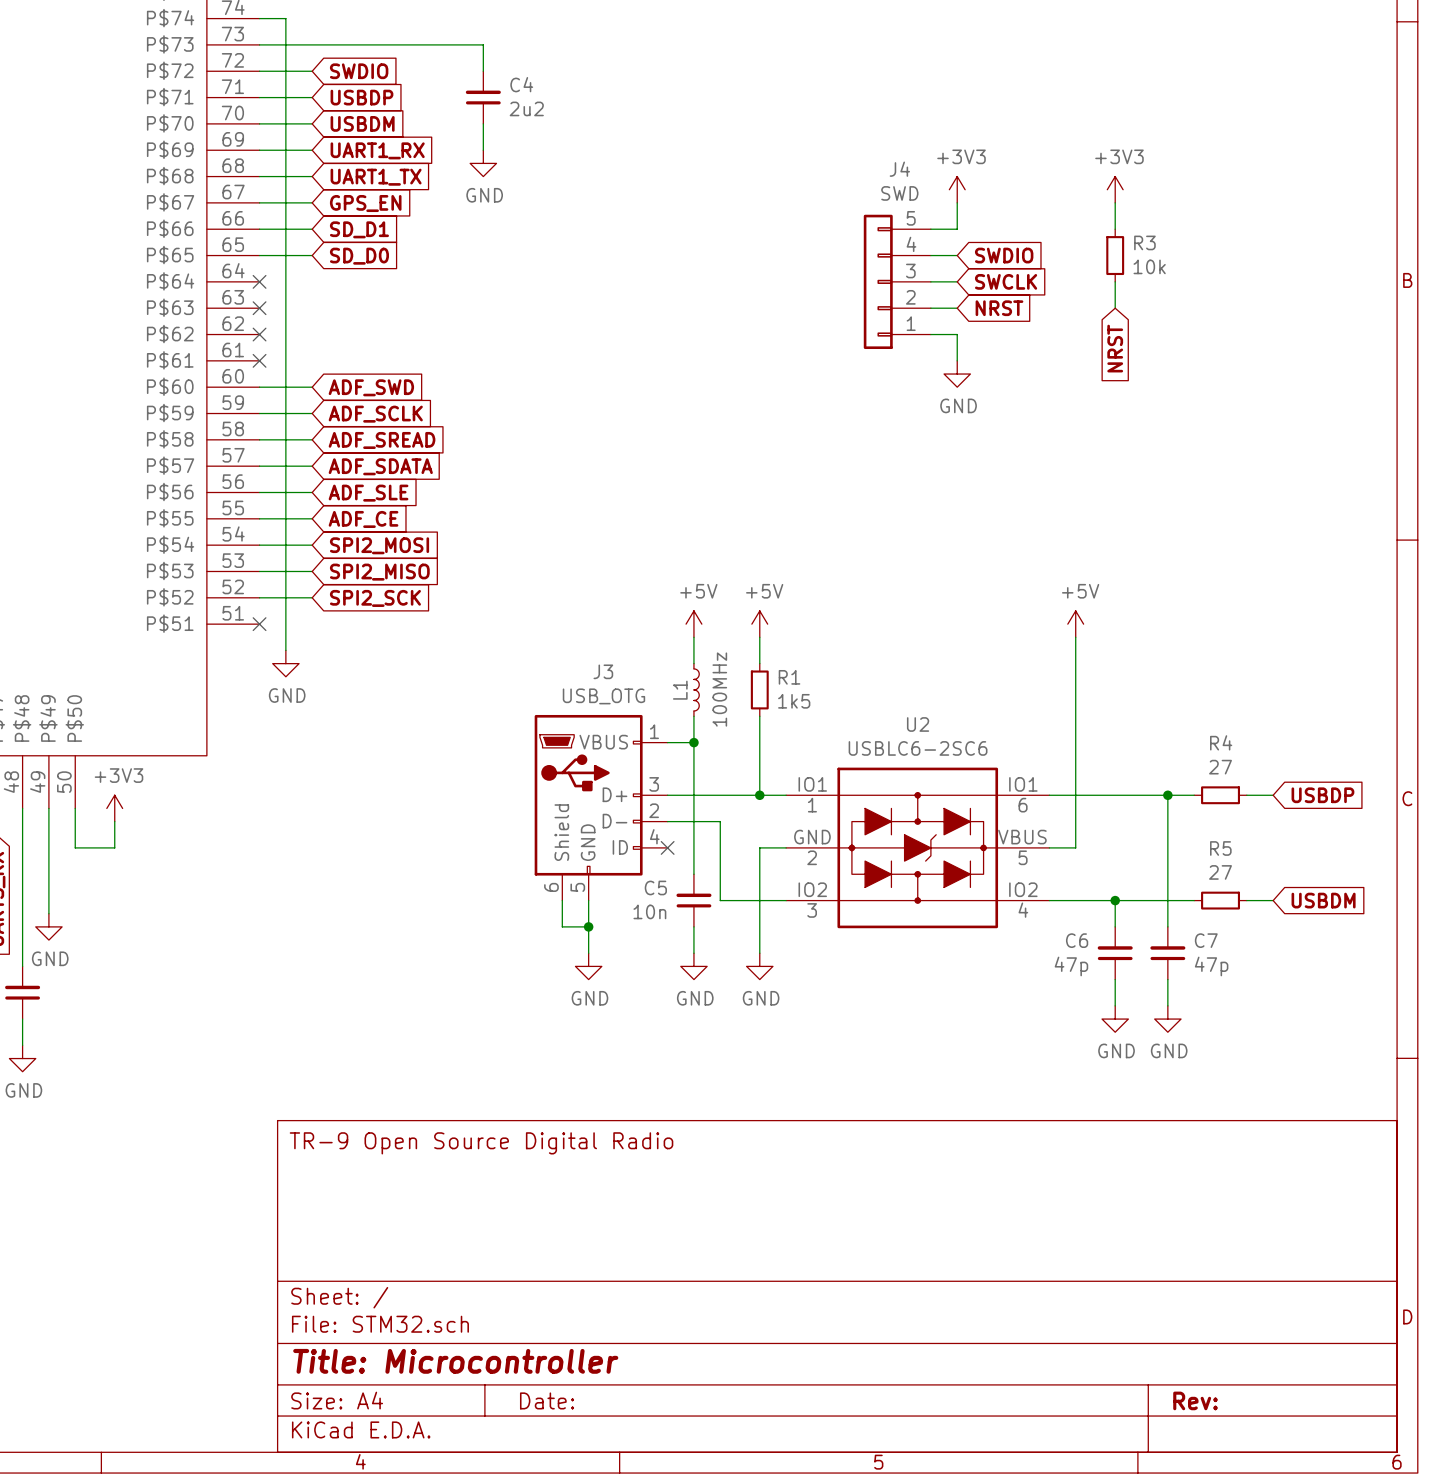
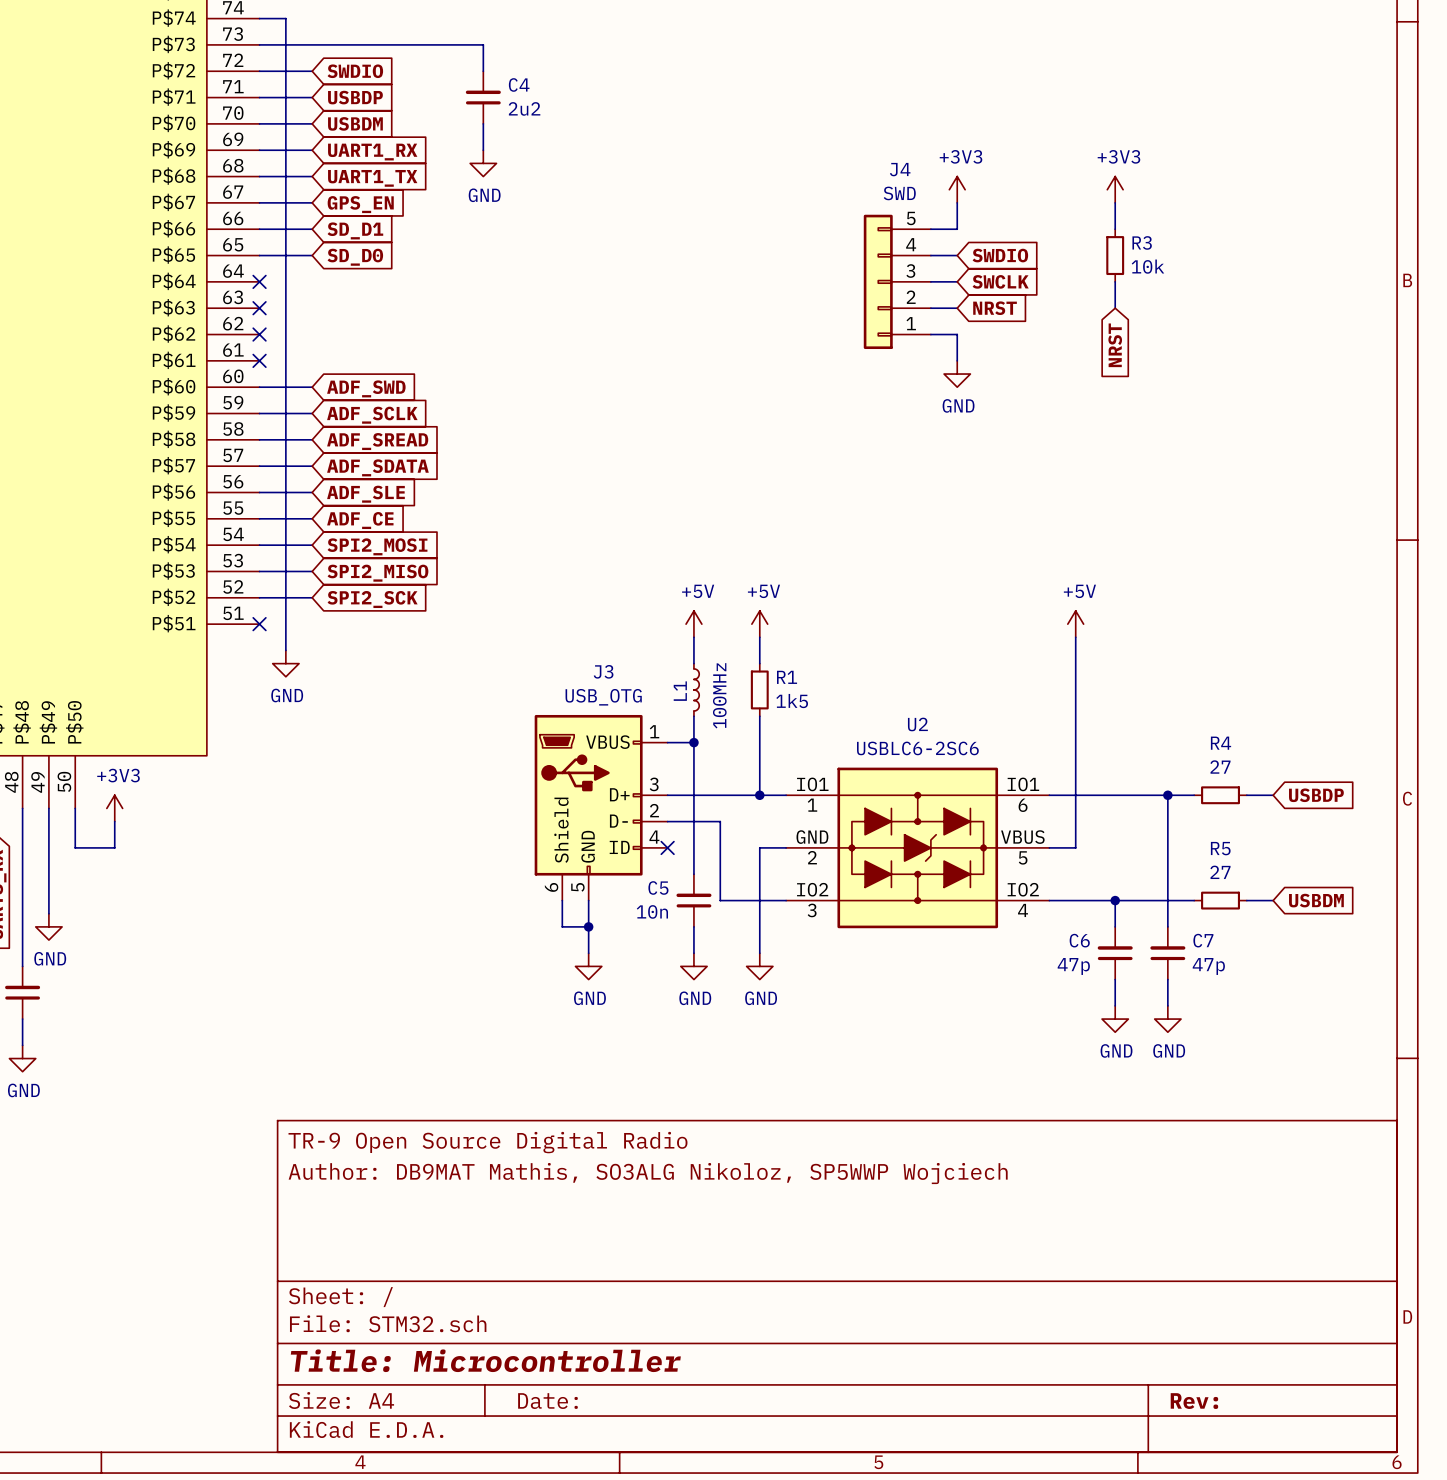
title block: none -> Author: DB9MAT Mathis, SO3ALG Nikoloz, SP5WWP Wojciech (648, 1173)

